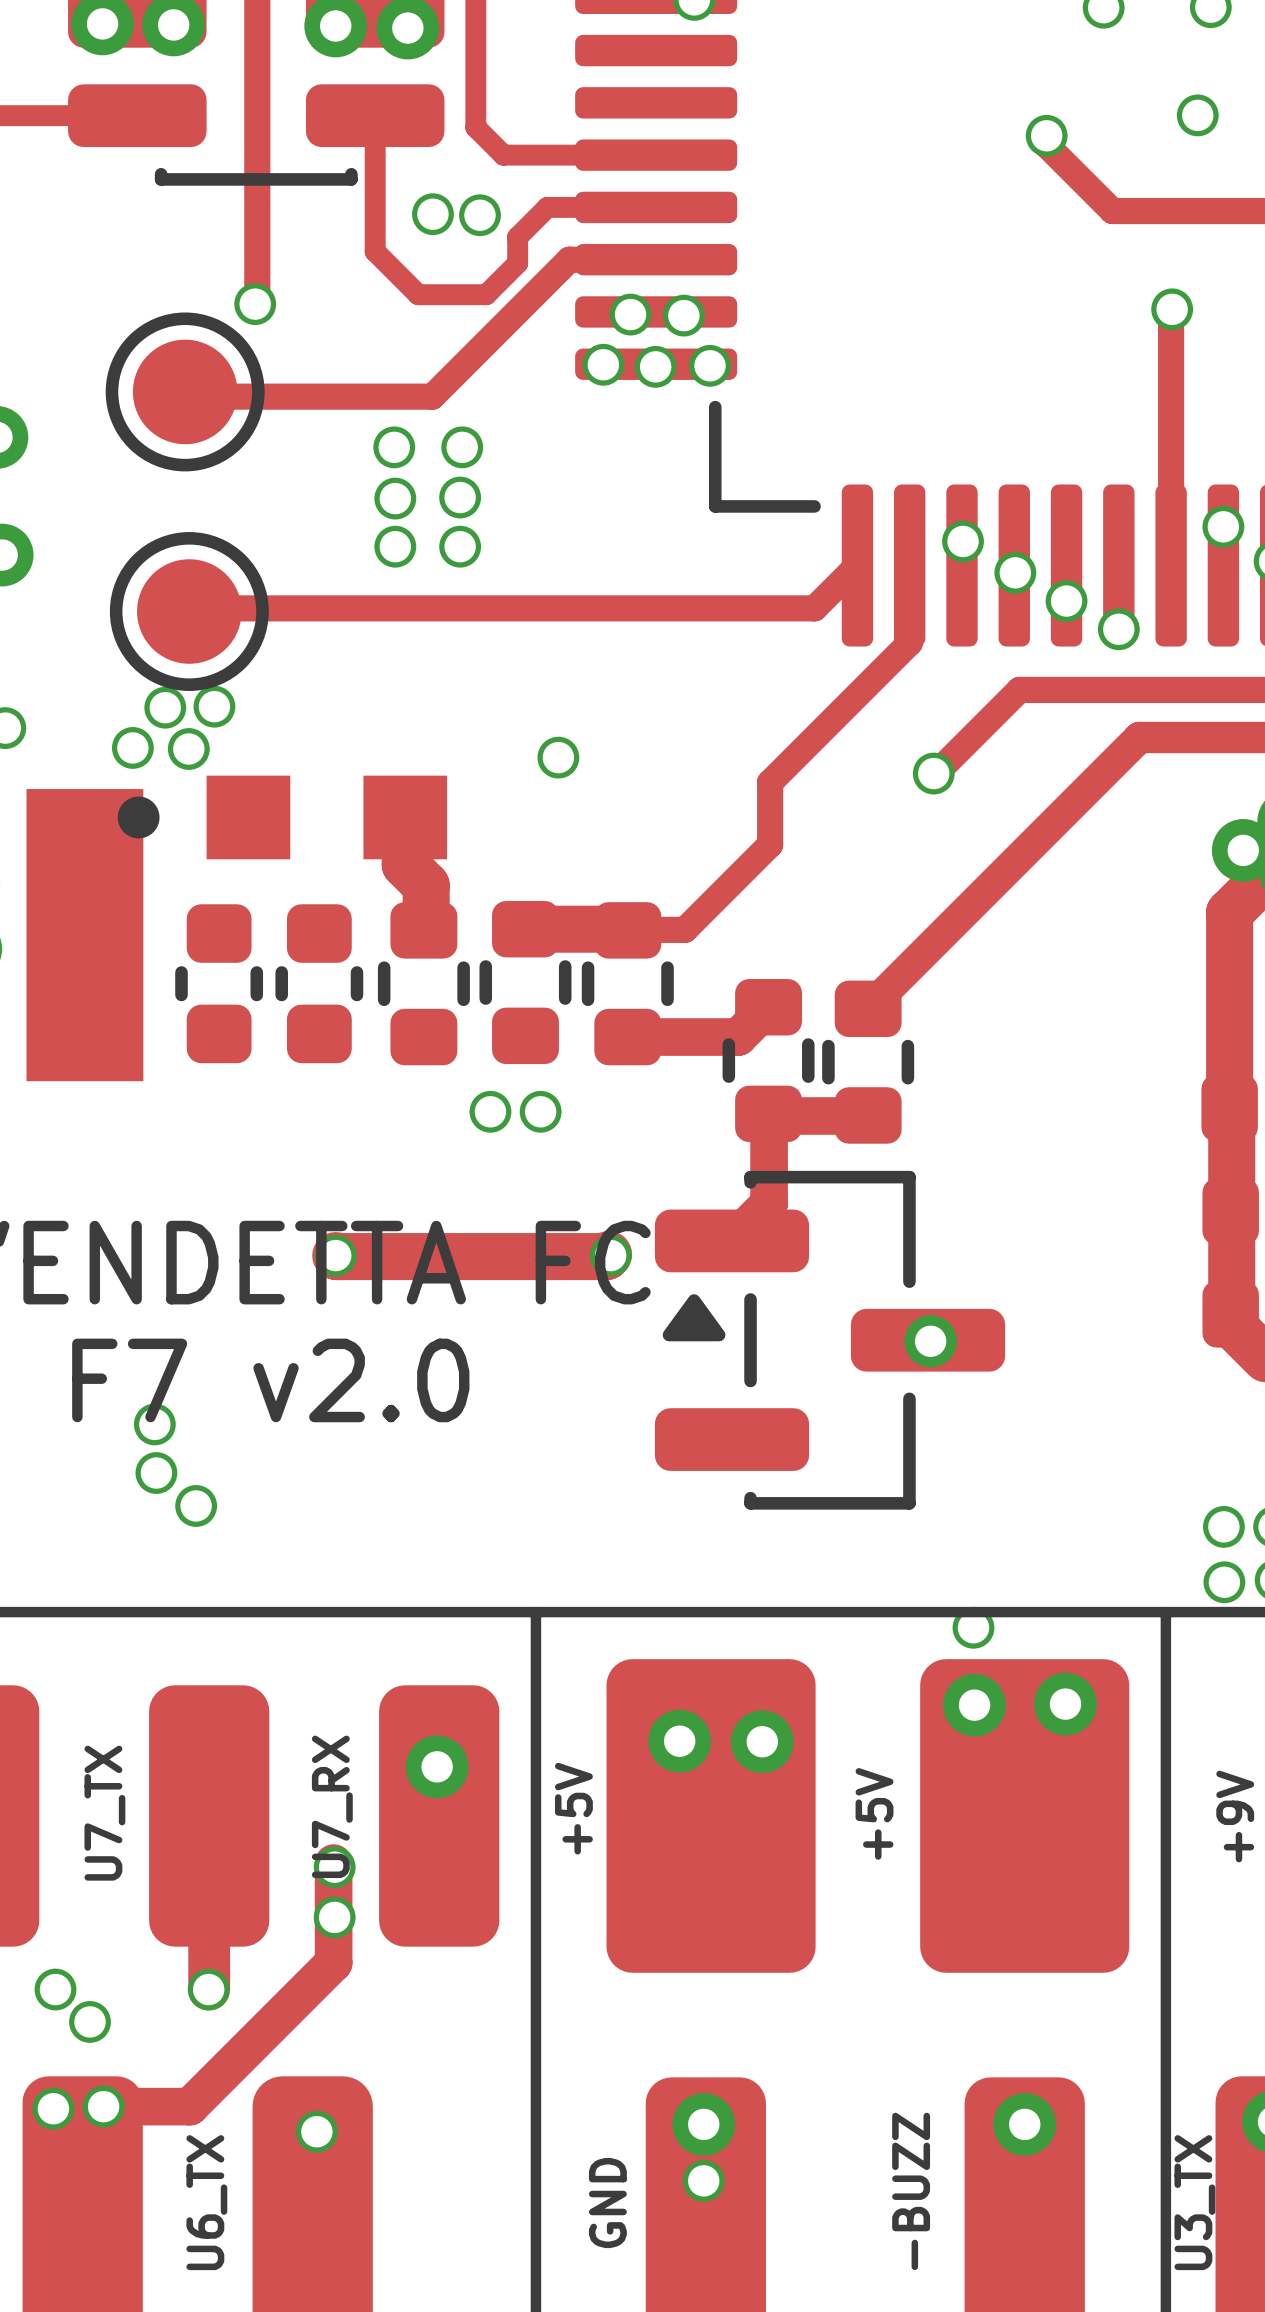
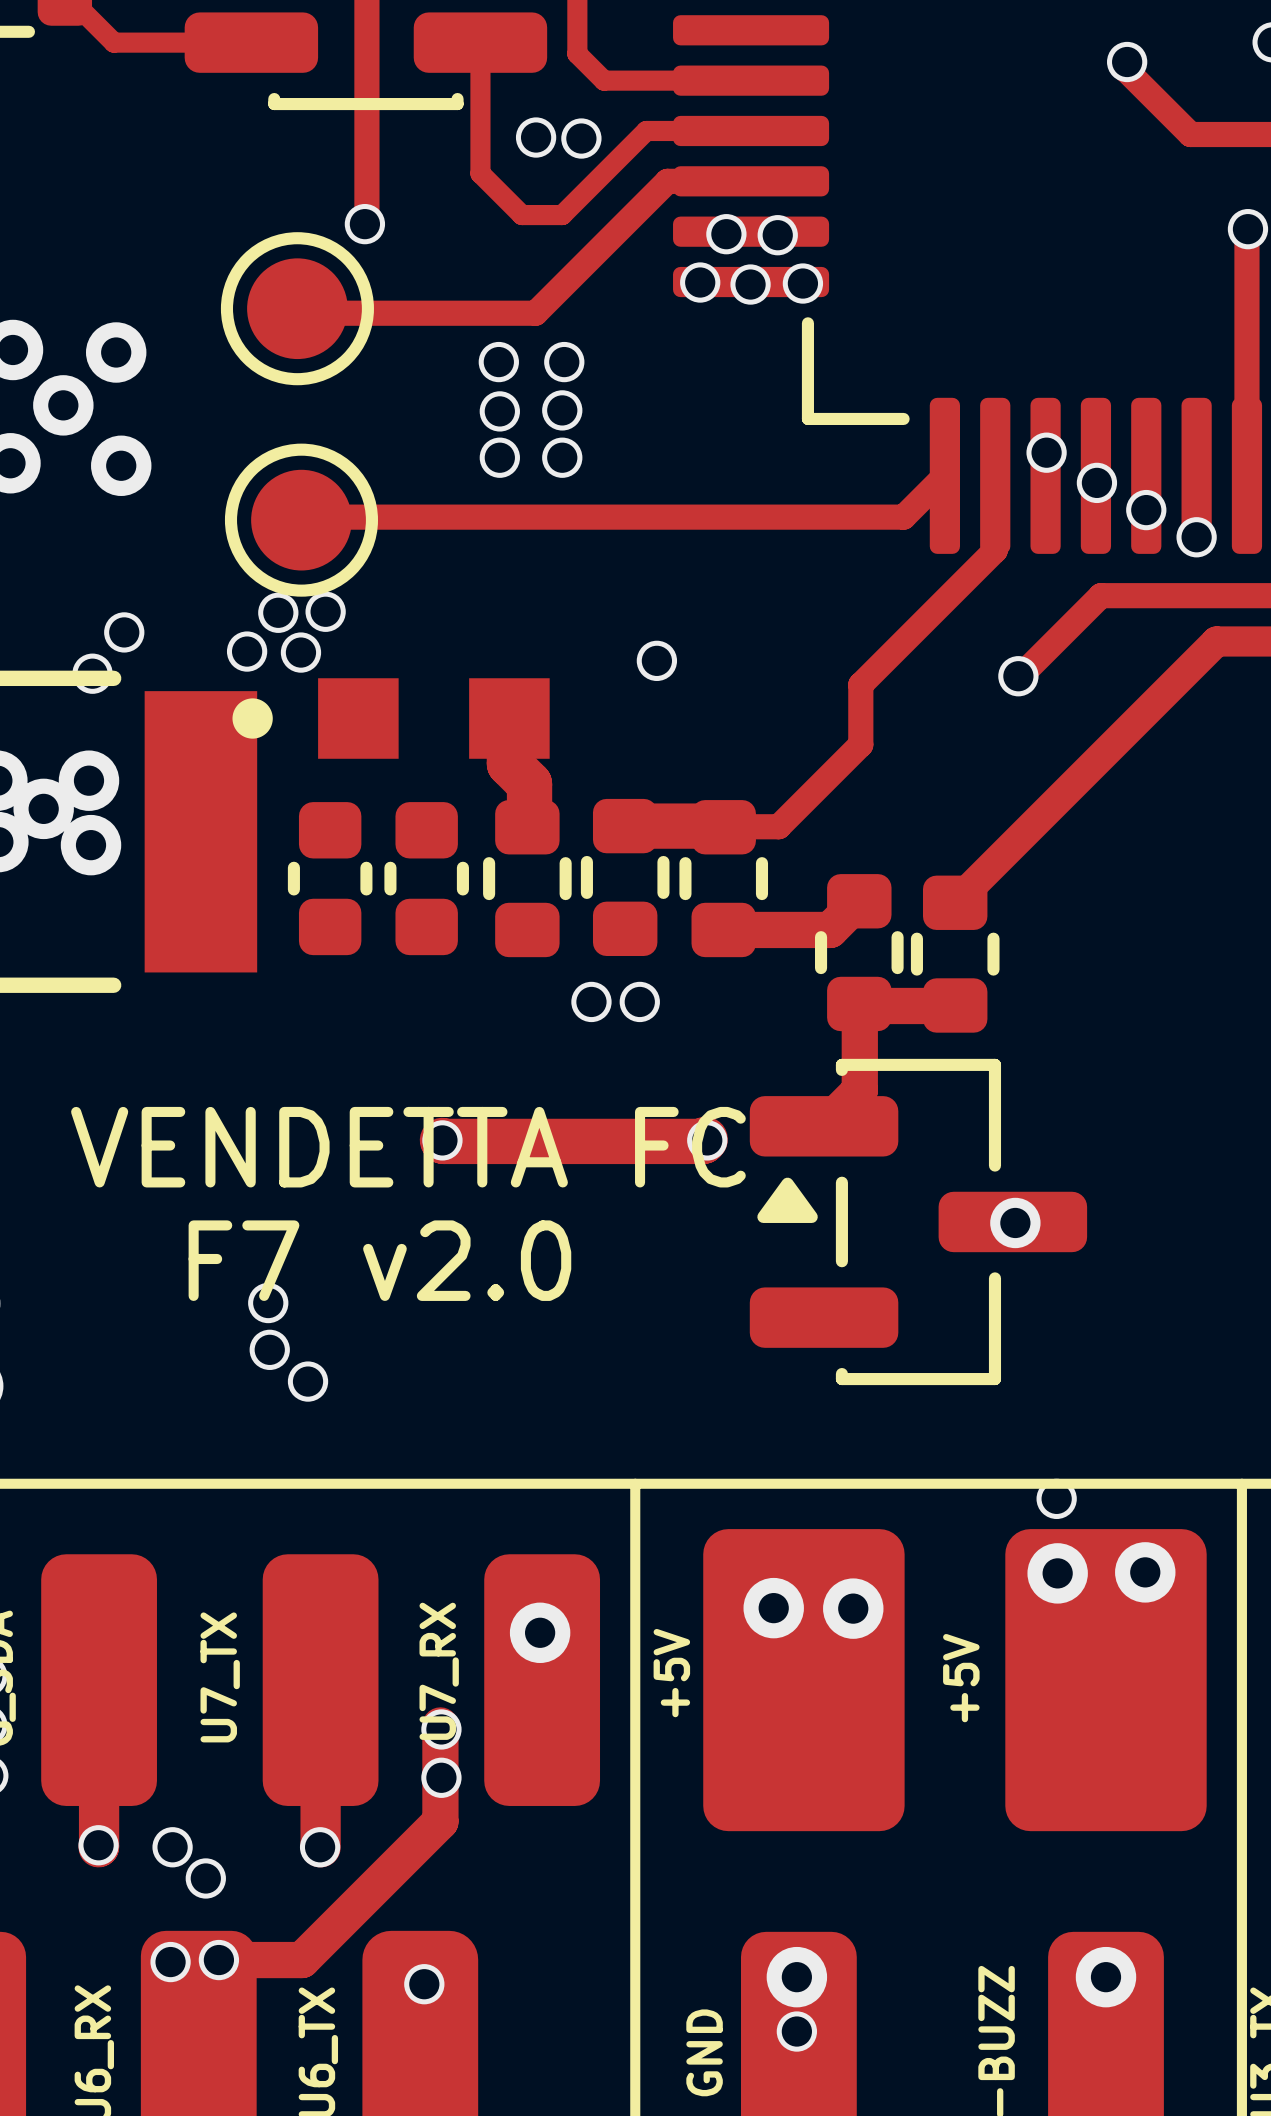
track: (517, 237) (517, 263) (486, 294) (460, 294) -> (617, 159) (562, 215)

